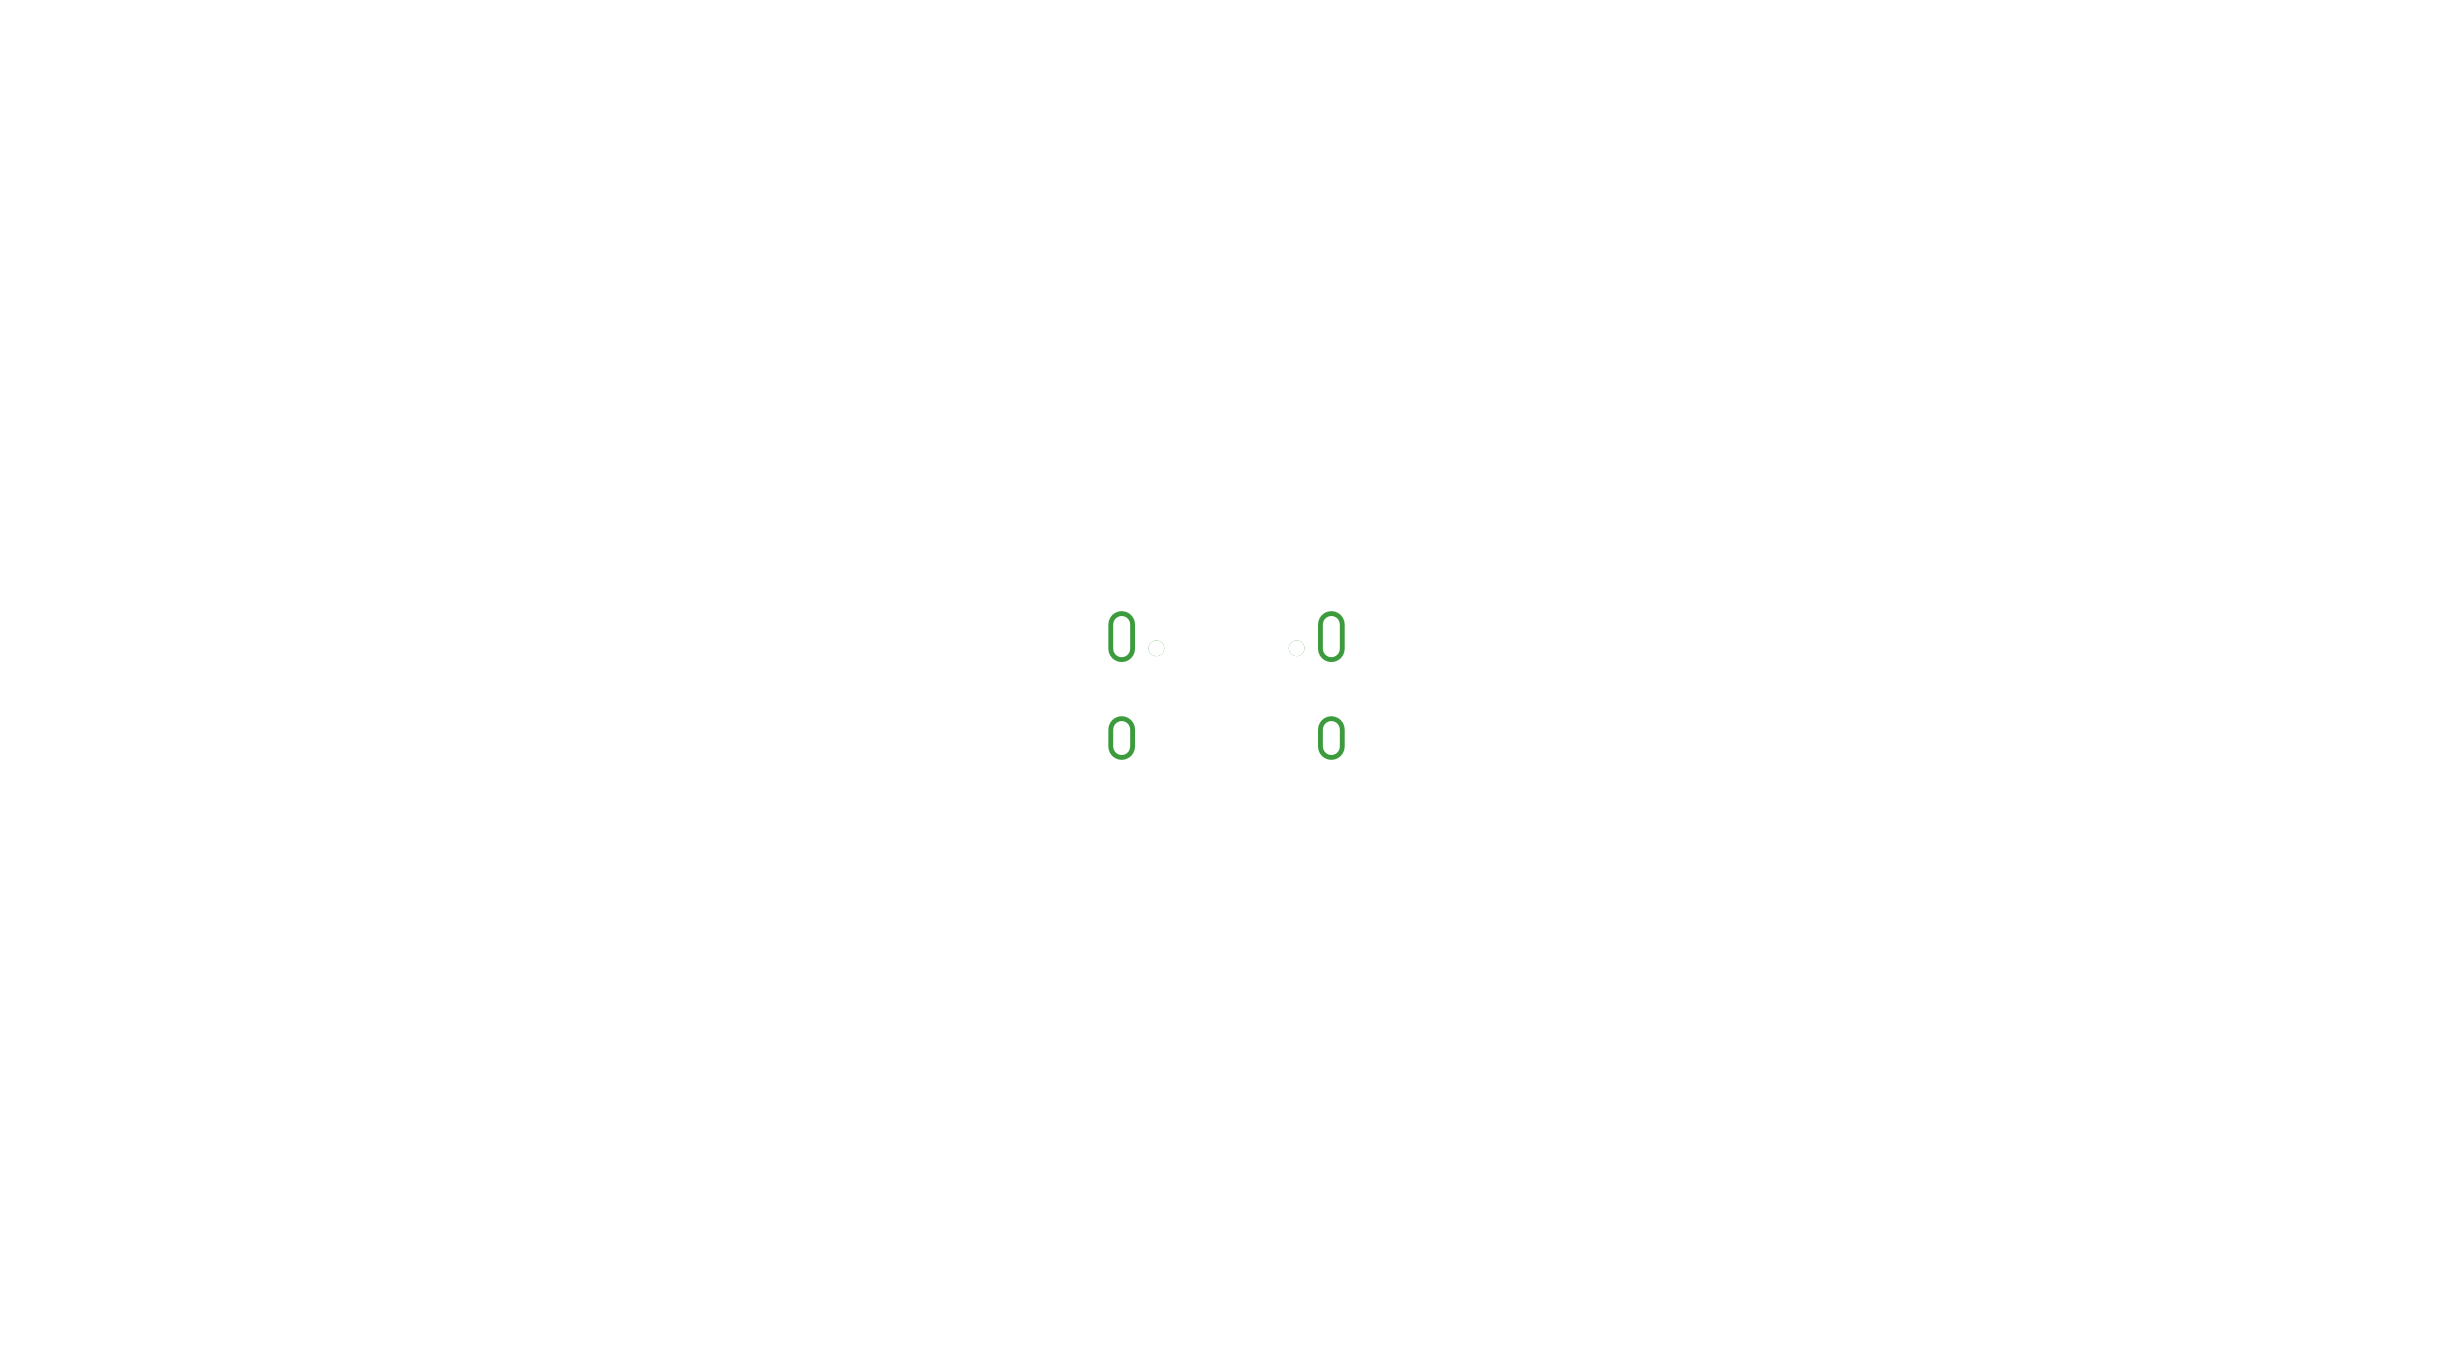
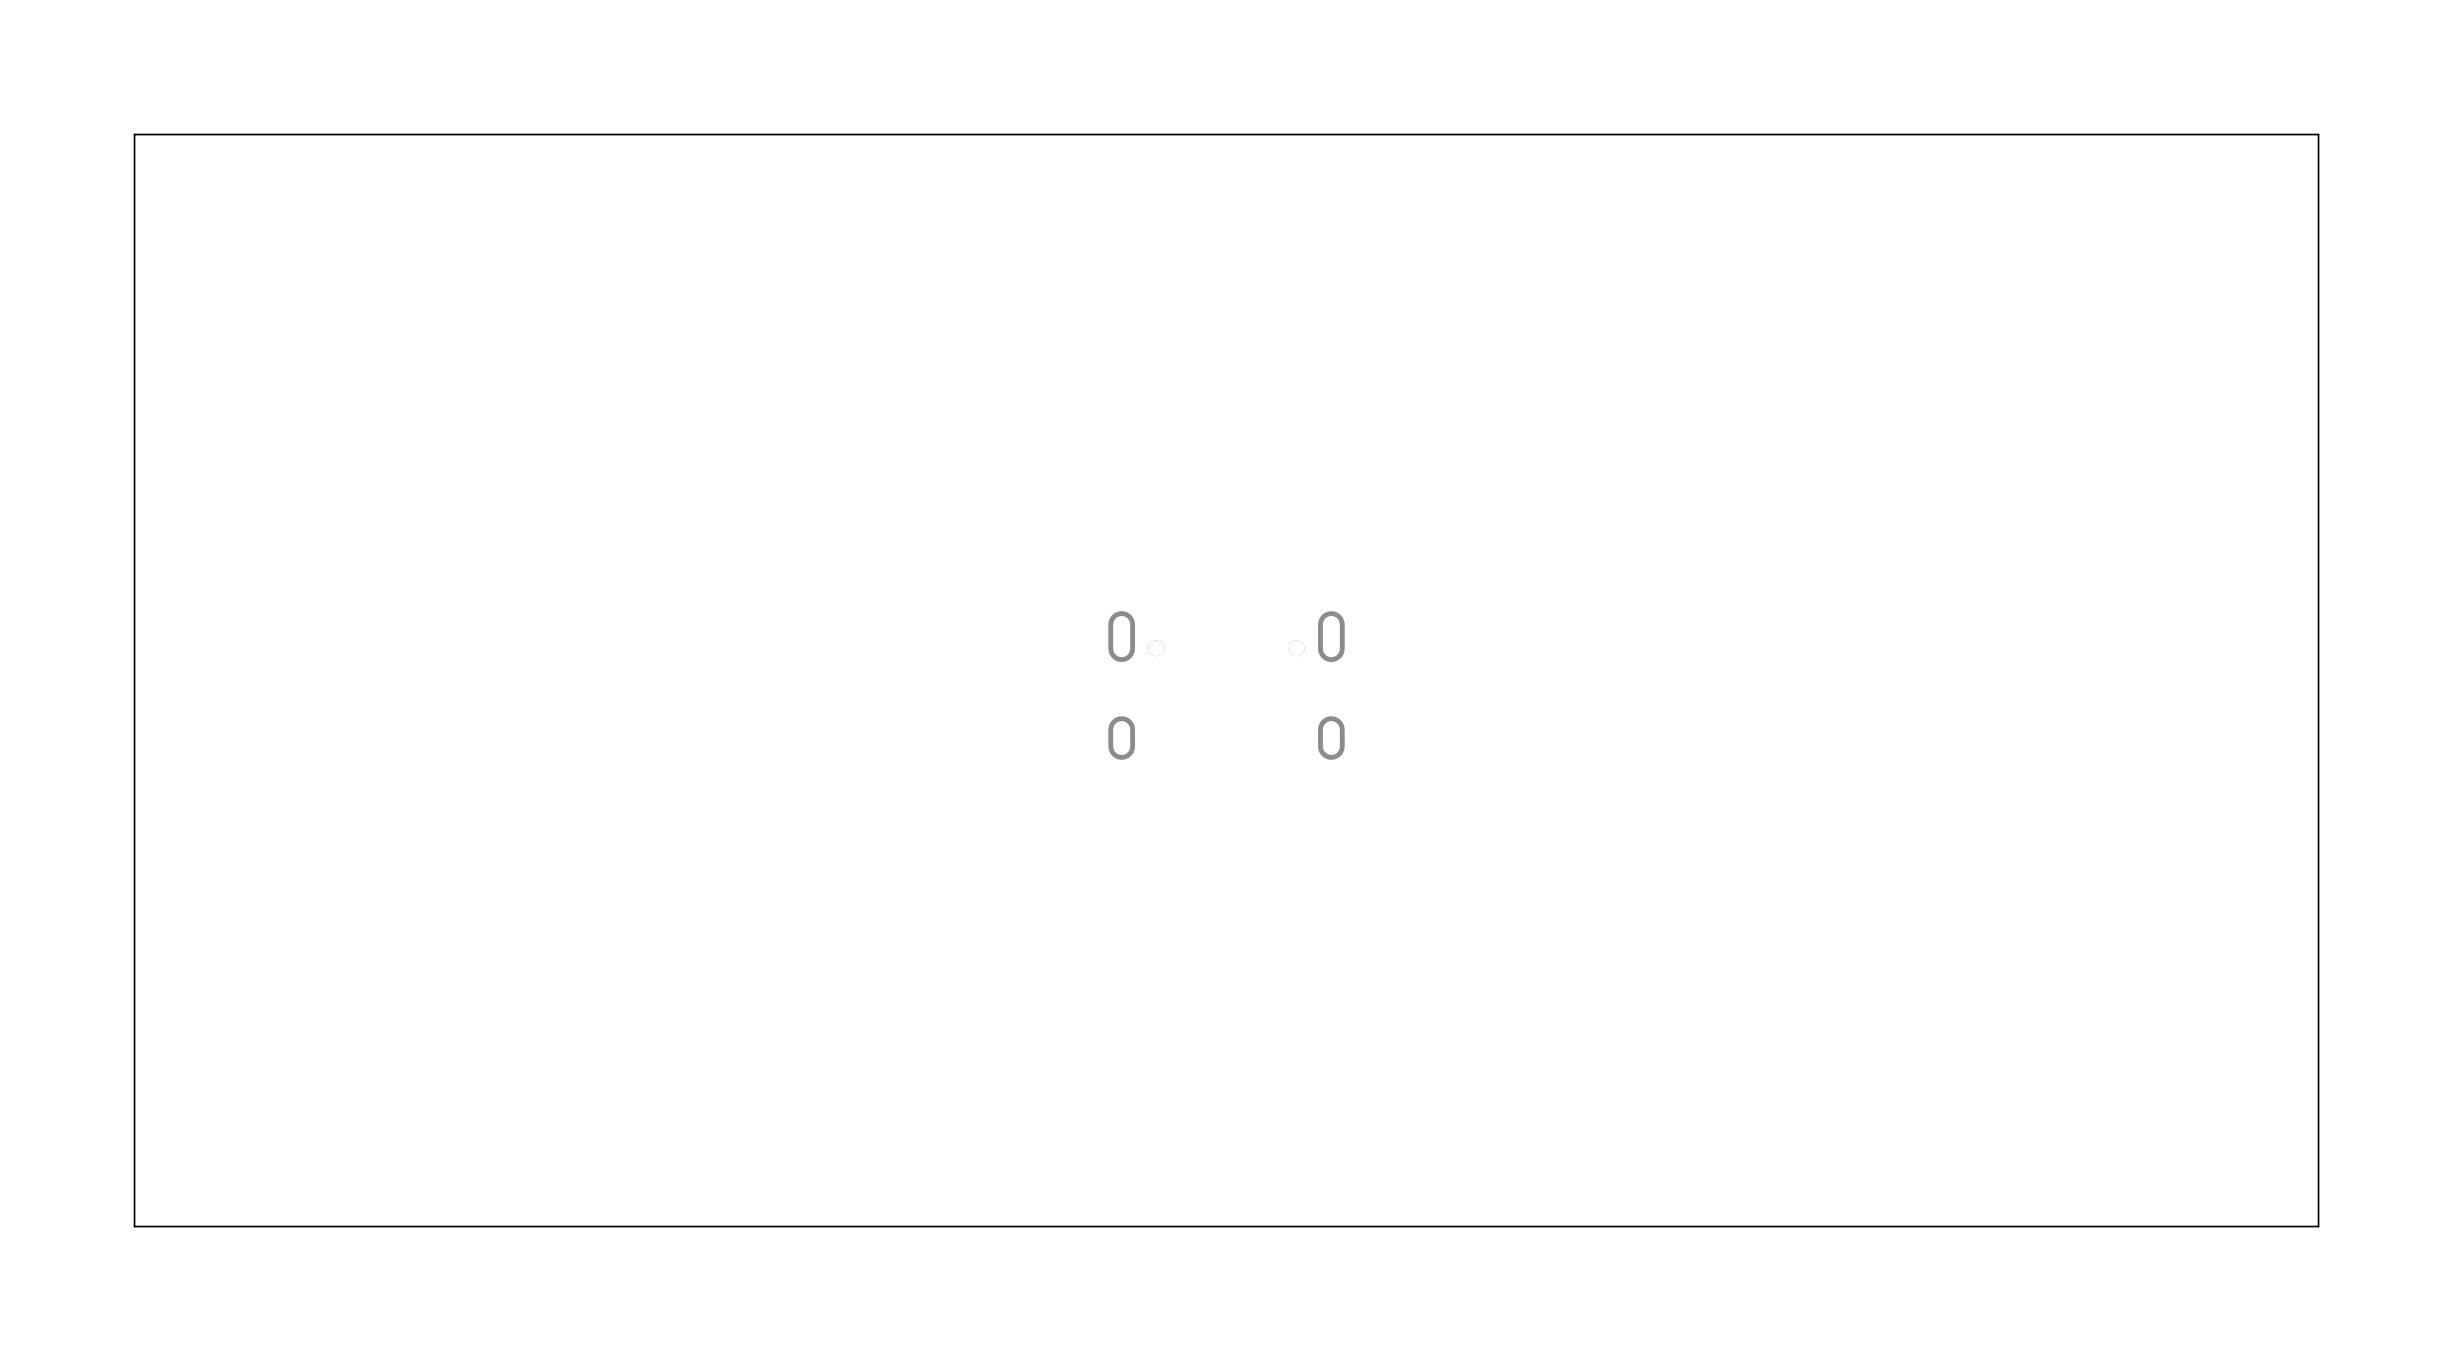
board edge: none -> (2318, 134) (134, 134) (134, 1226) (2318, 1226) (2318, 134)

